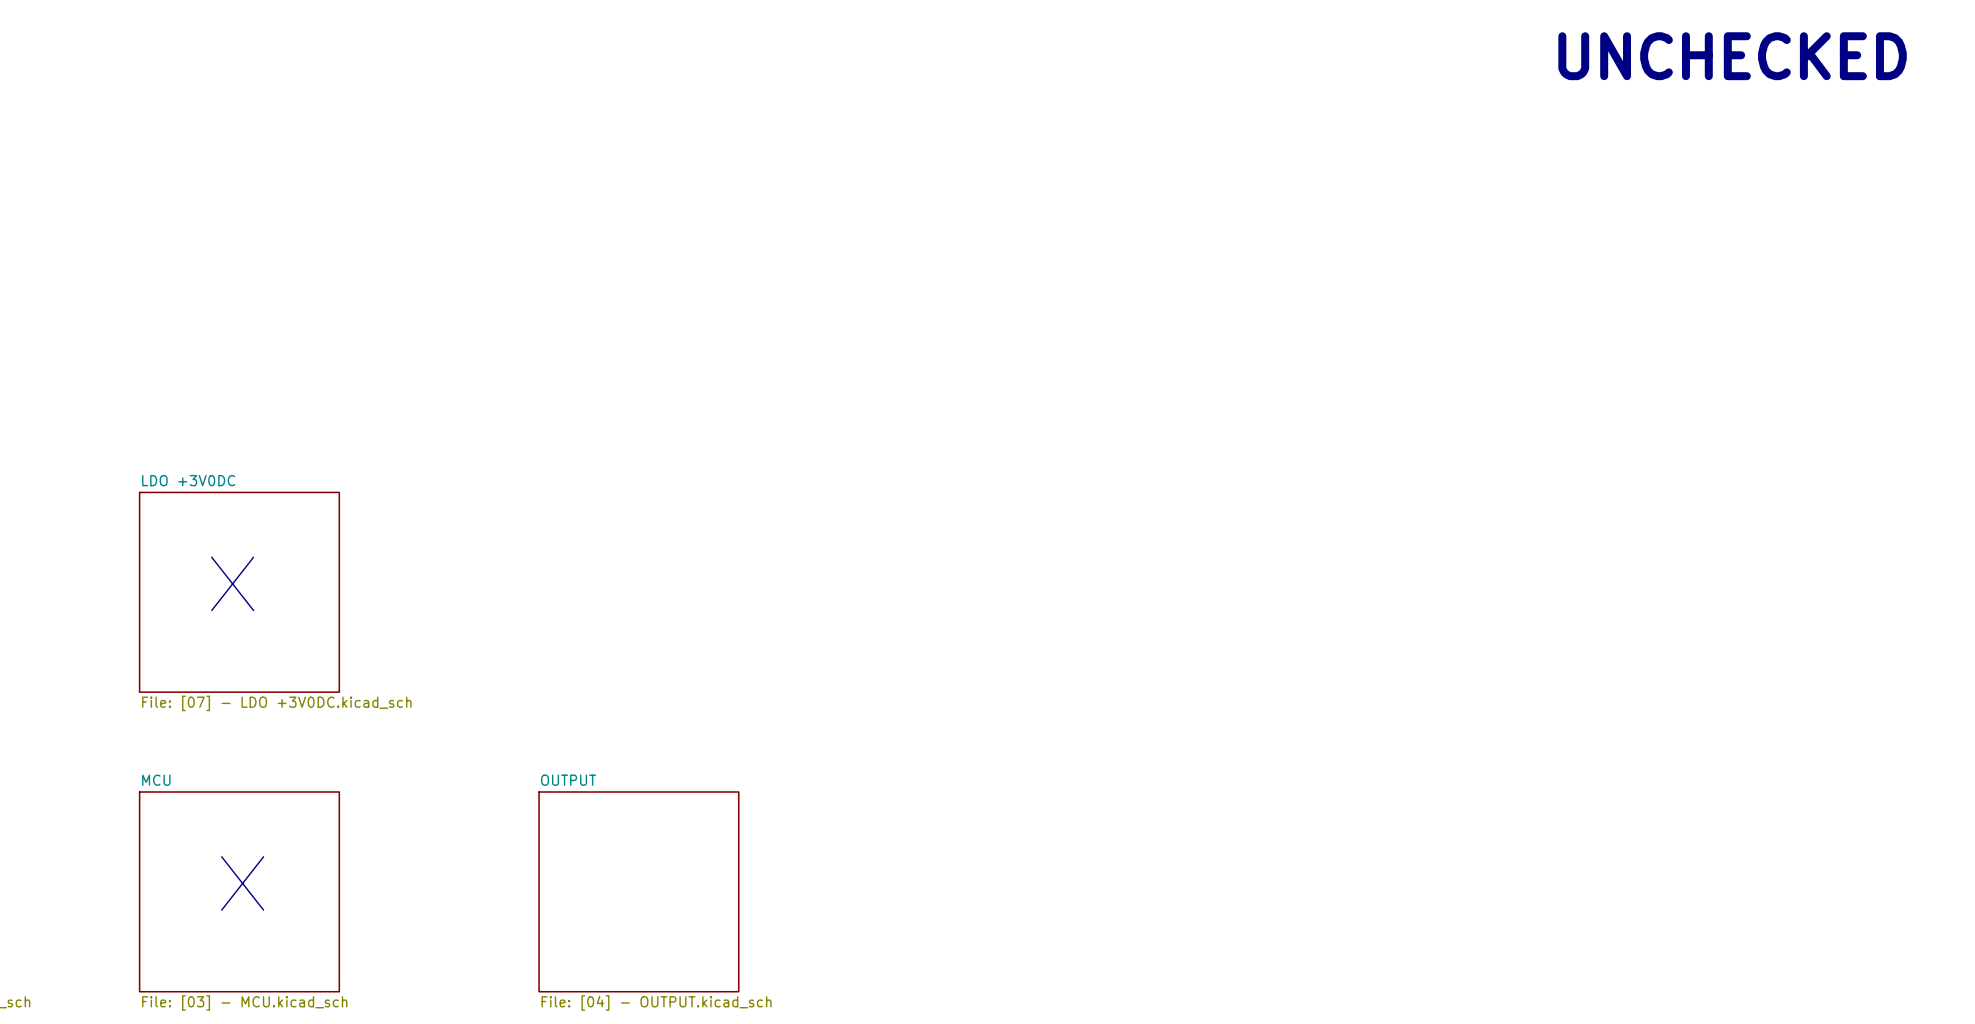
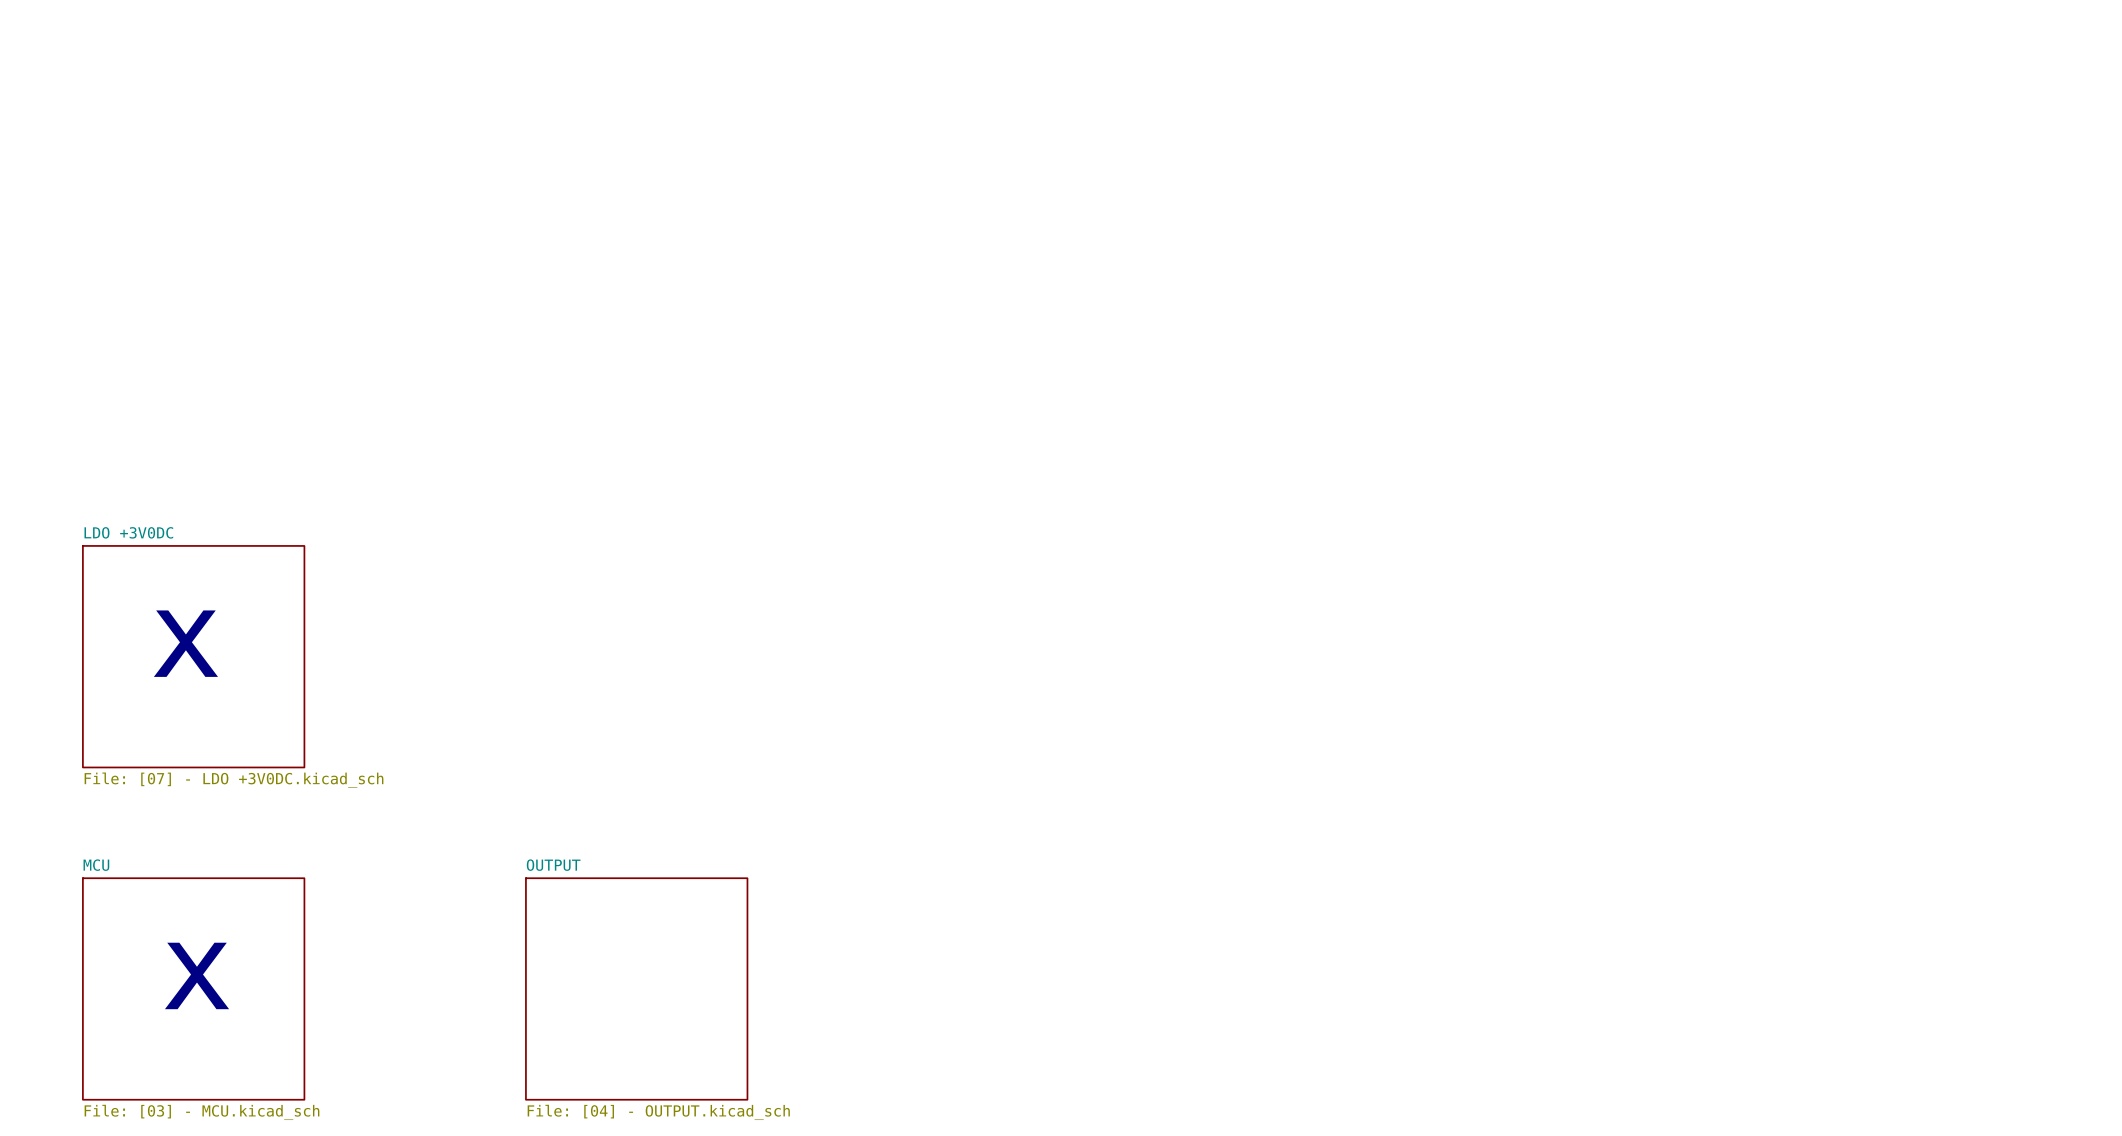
text: UNCHECKED (1732, 56) -> none

